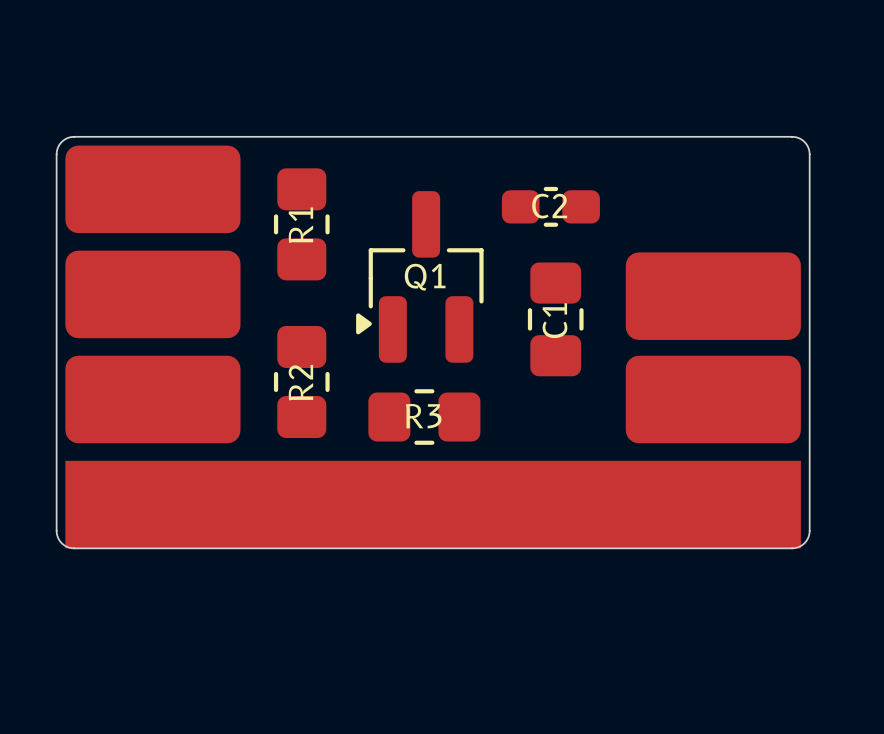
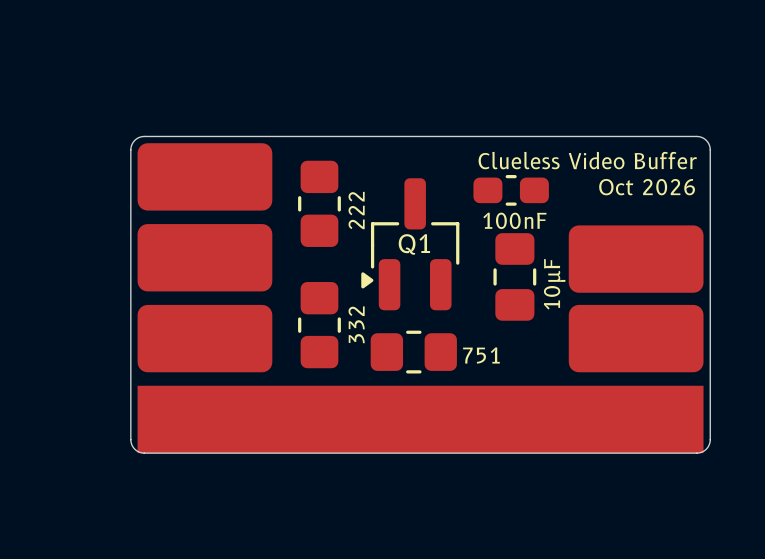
text: none -> Clueless Video Buffer (587, 160)
text: none -> Oct 2026 (647, 187)
C2 name: C2 (549, 206) -> none
R1 name: R1 (300, 225) -> none
text: none -> 222 (356, 210)
text: none -> 100nF (514, 220)
C1 name: C1 (554, 320) -> none
text: none -> 10µF (554, 284)
text: none -> 332 (356, 324)
R2 name: R2 (300, 382) -> none
R3 name: R3 (423, 416) -> none
text: none -> 751 (481, 355)

